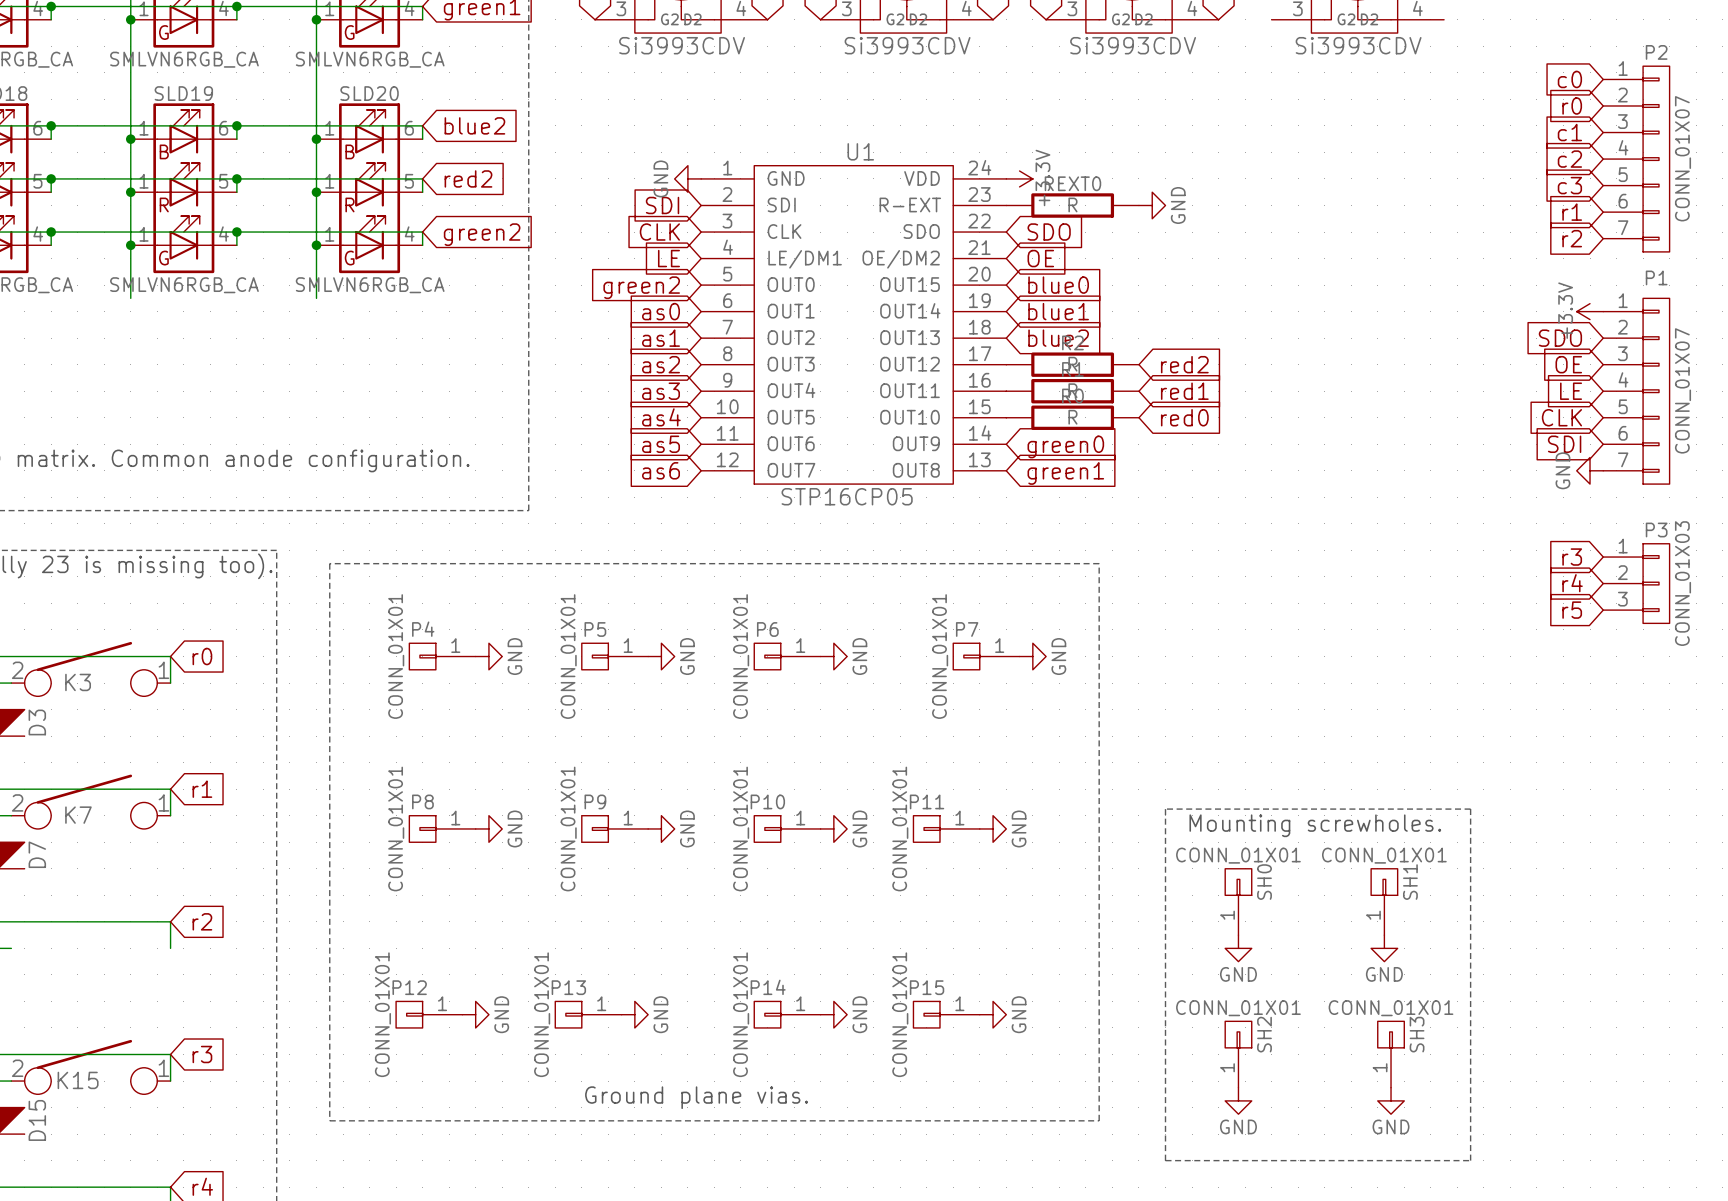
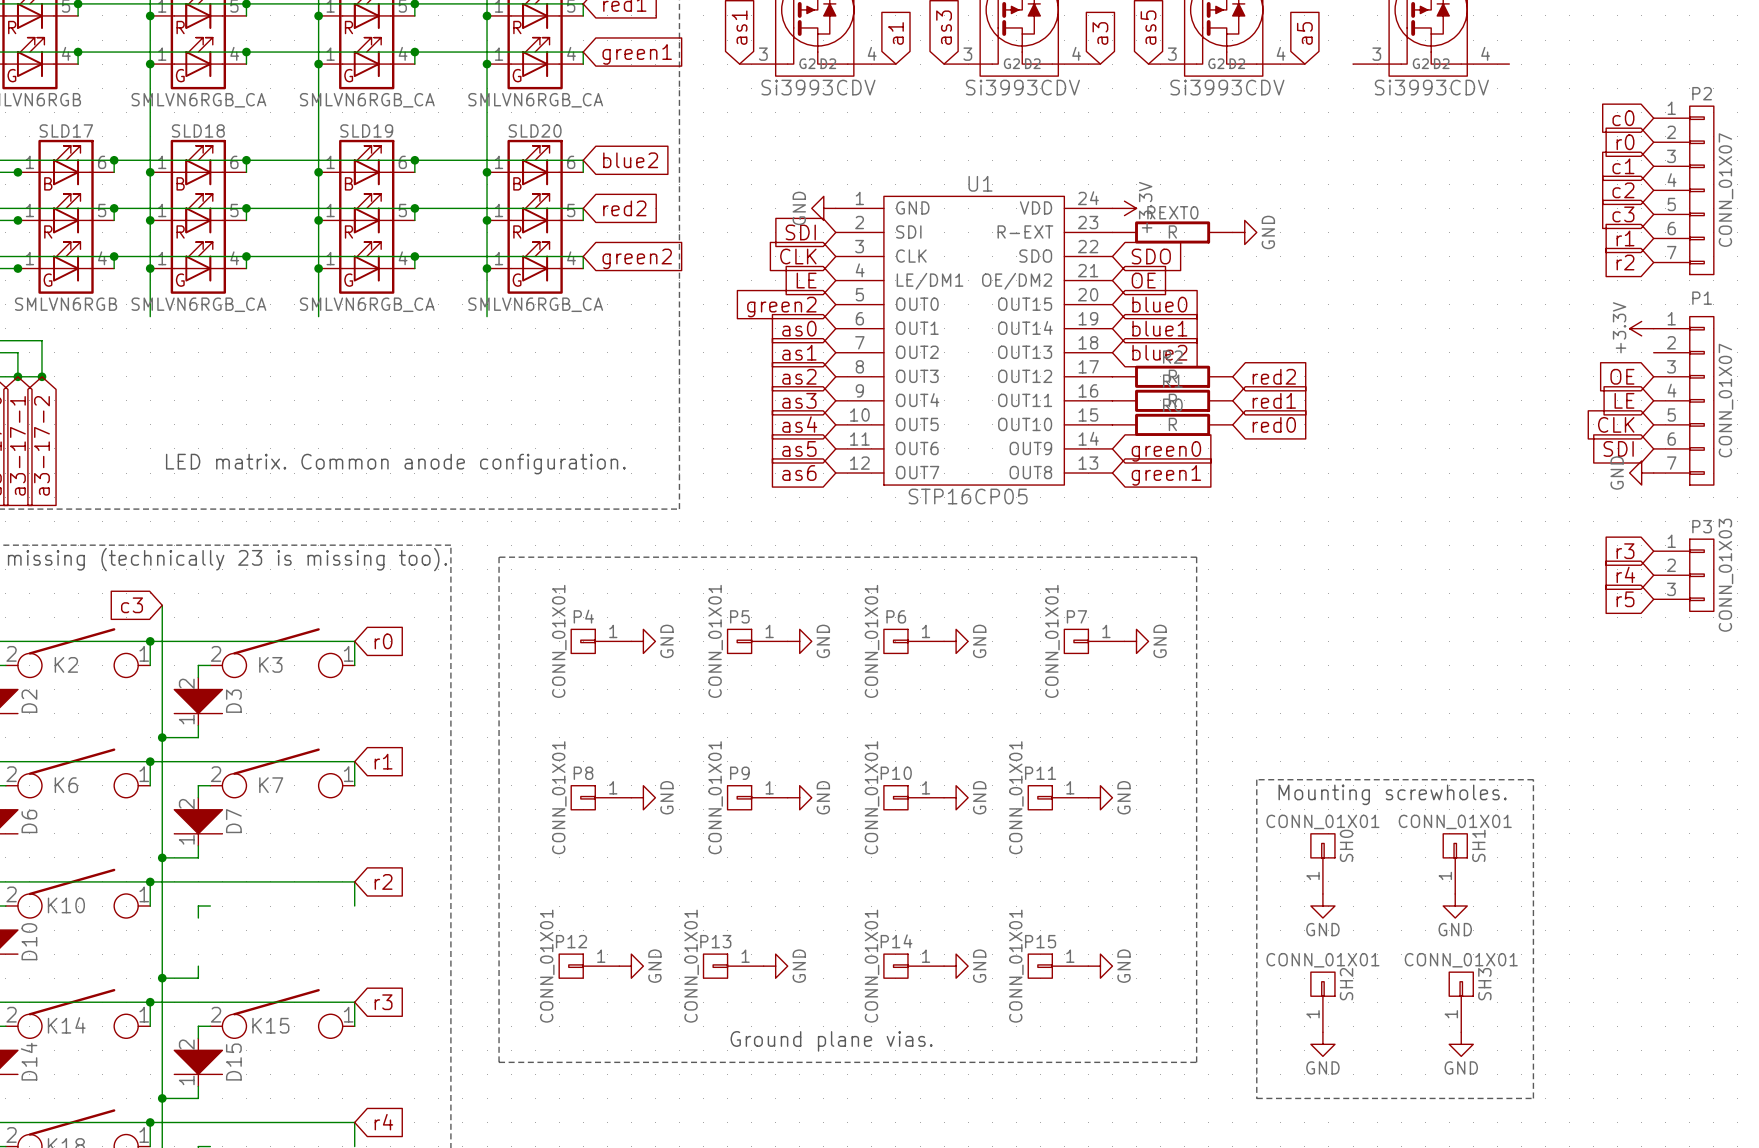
global label: SDO (1560, 338) -> none

